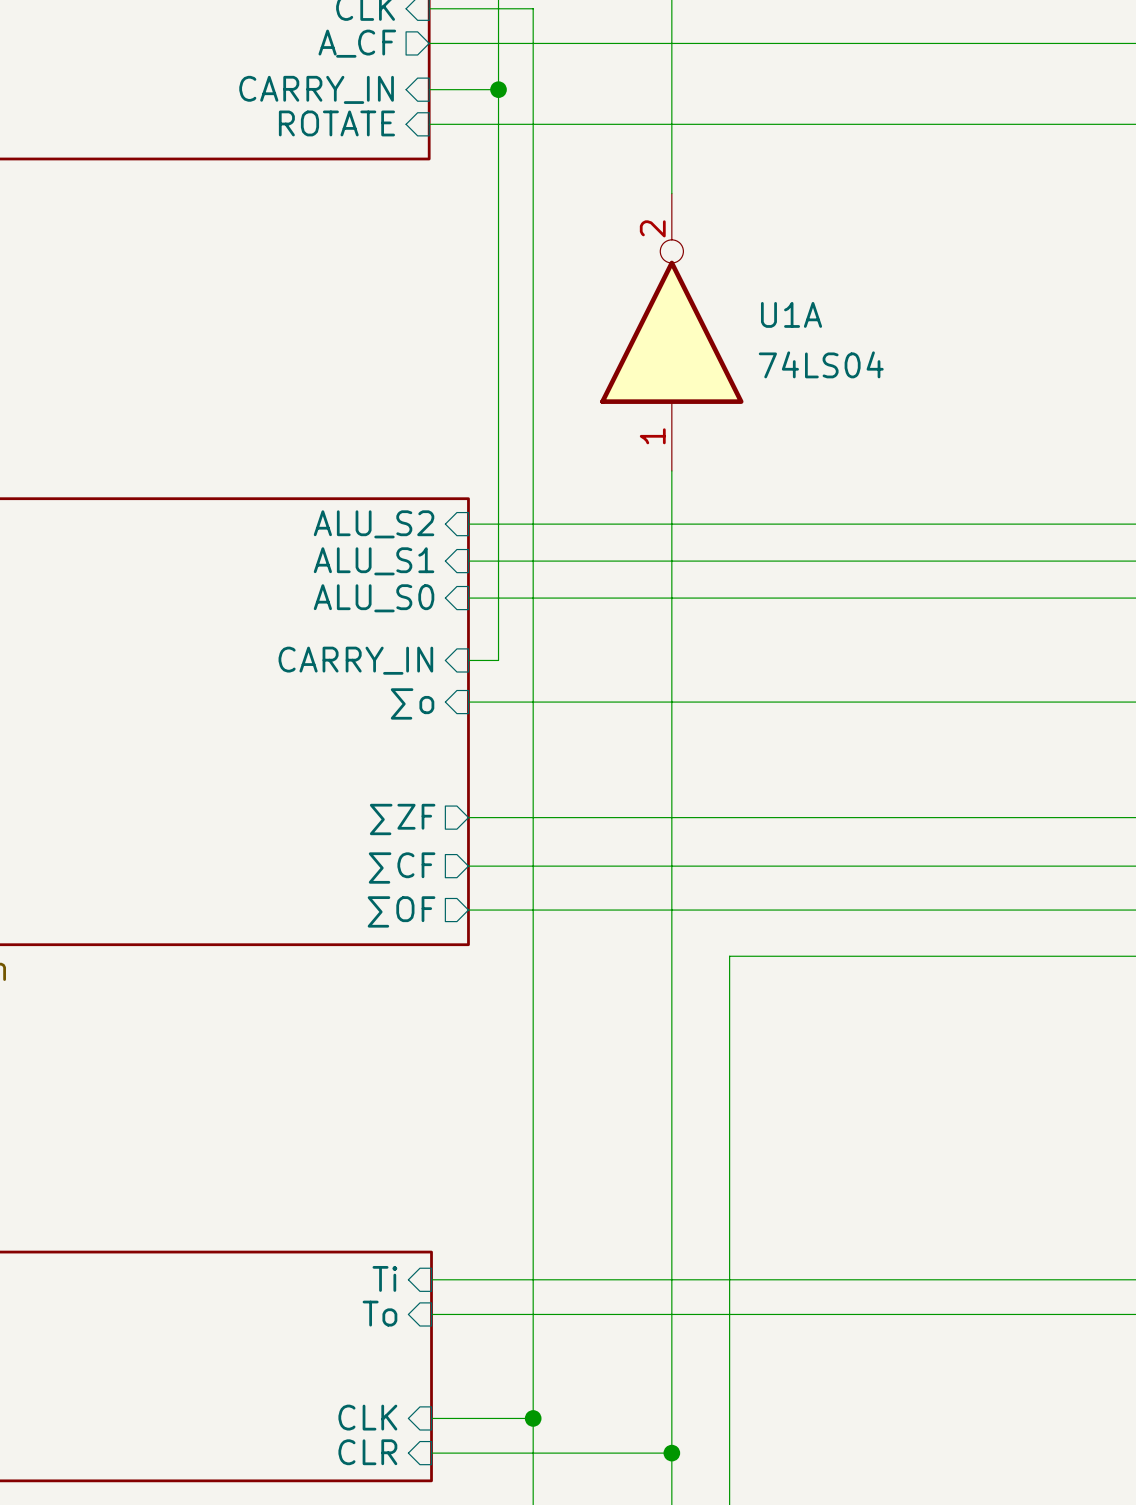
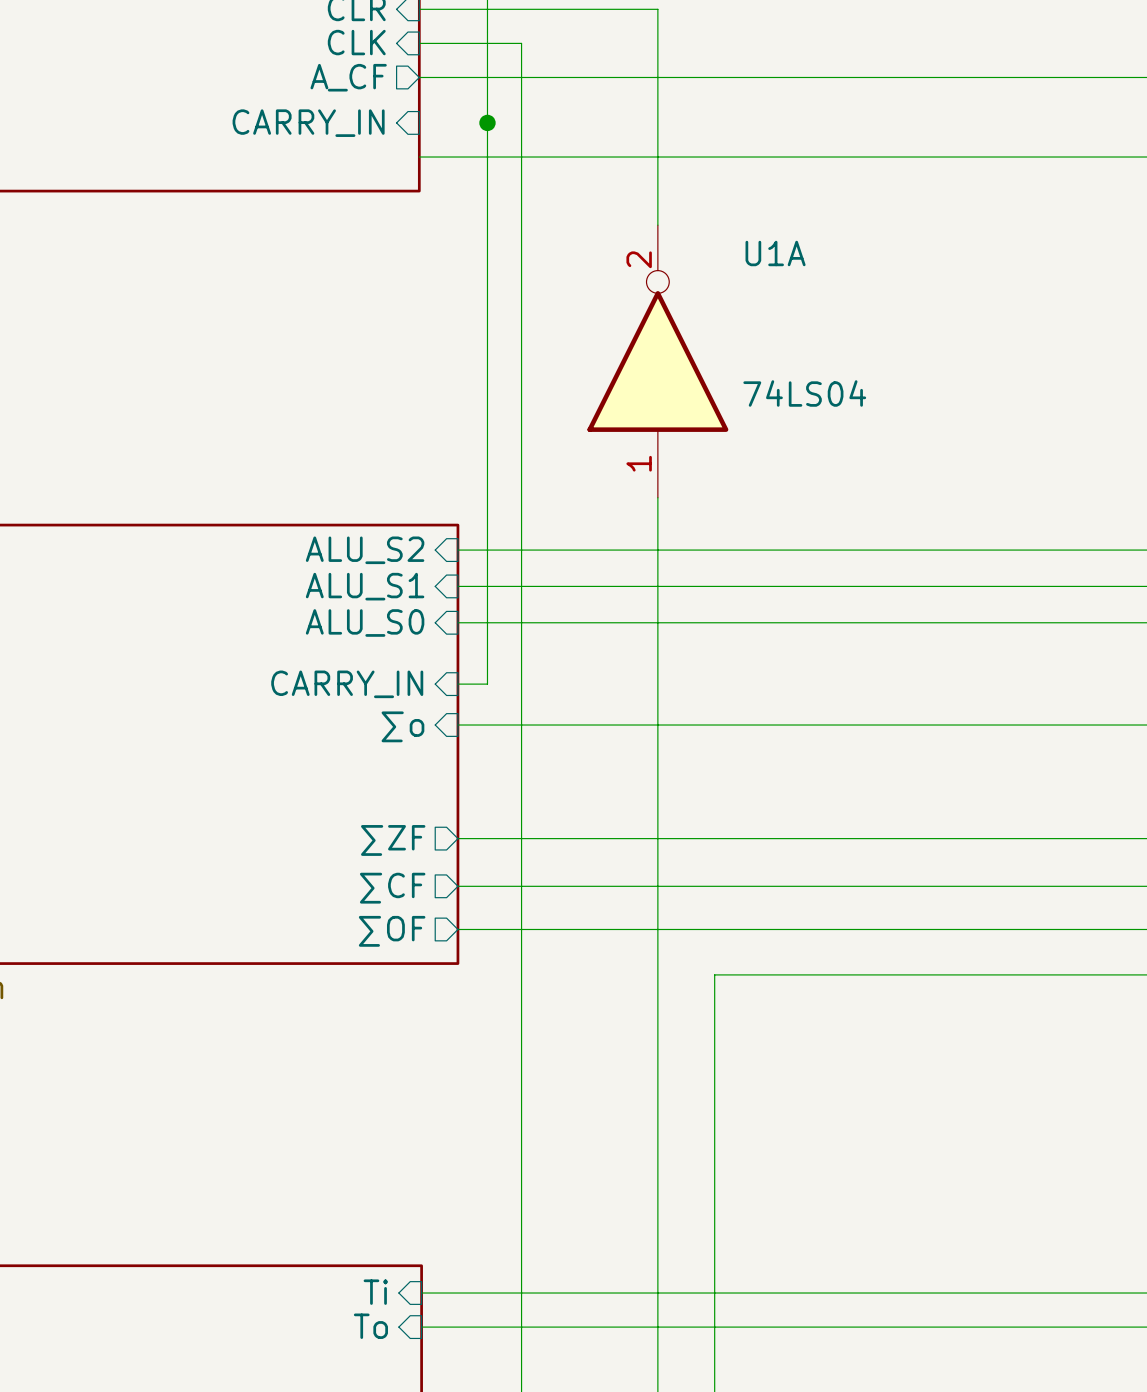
wire: (429, 89) (498, 89) -> none
sheet pin: ROTATE (336, 123) -> none
U1A name position: U1A (791, 314) -> U1A (775, 253)

